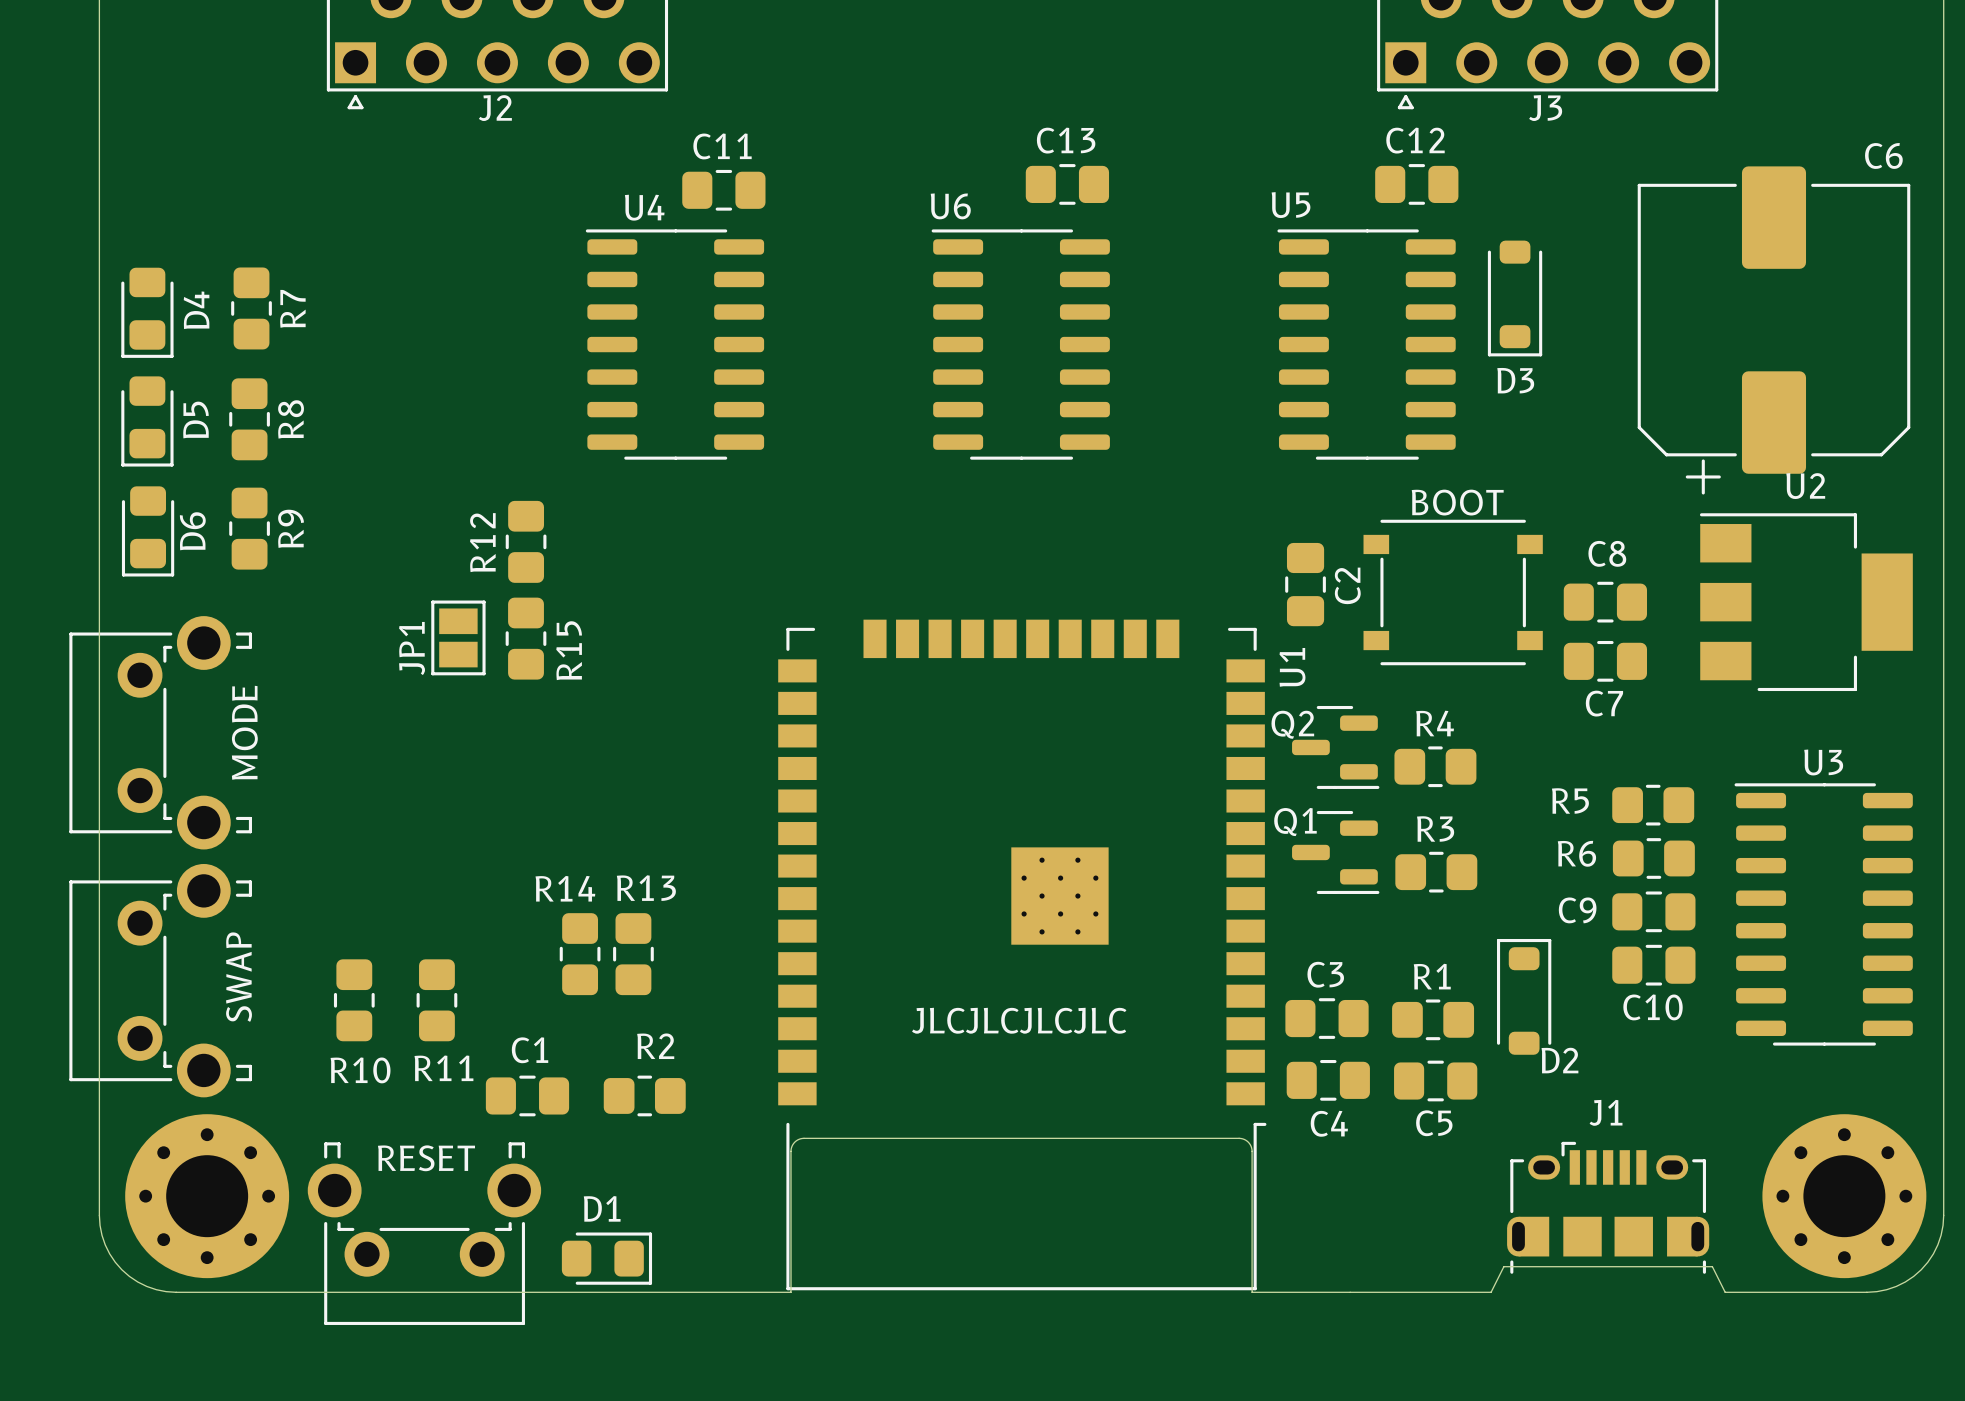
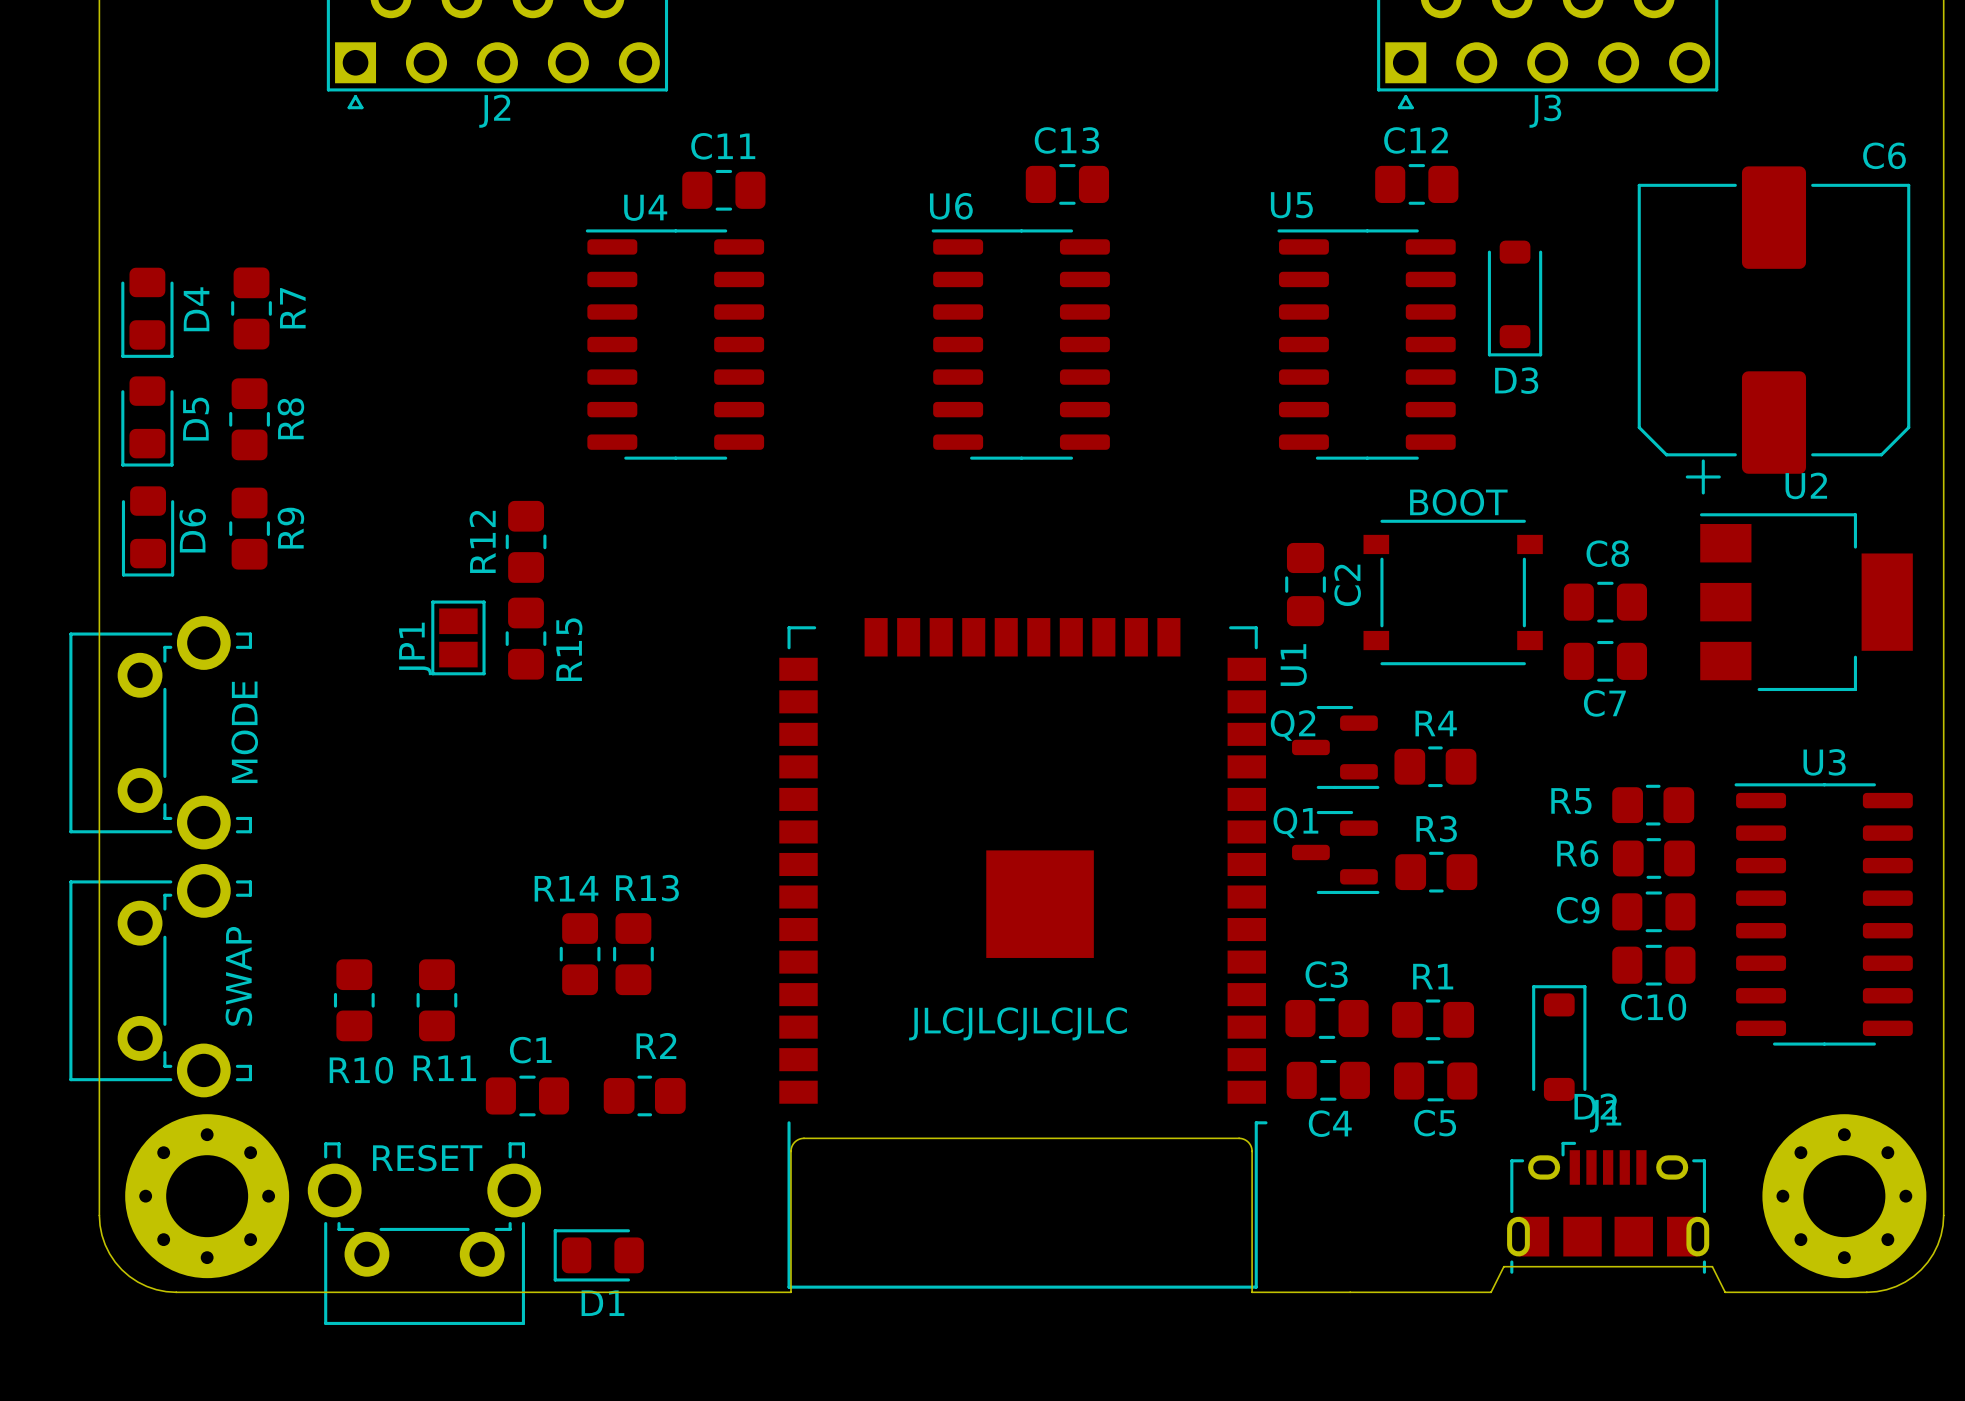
U1 footprint: [778, 619, 1267, 1291] -> [779, 618, 1268, 1289]
D2 position: (1524, 996) -> (1559, 1043)
D1 rotation: 0° (606, 1258) -> 180° (598, 1255)

